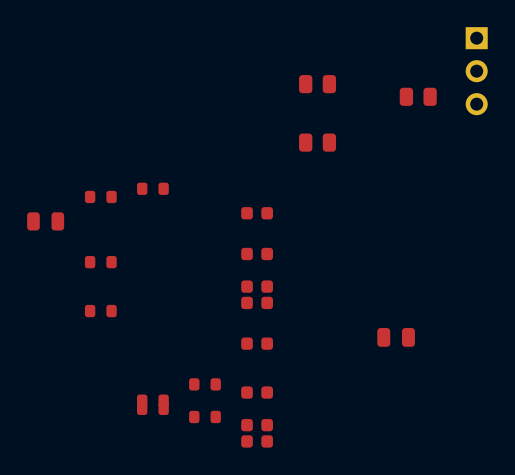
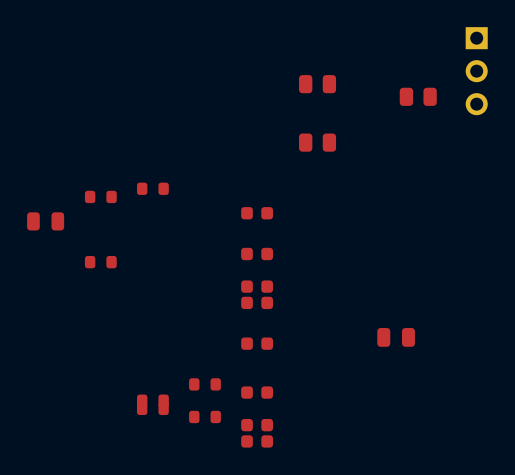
part: (100, 311) -> none

